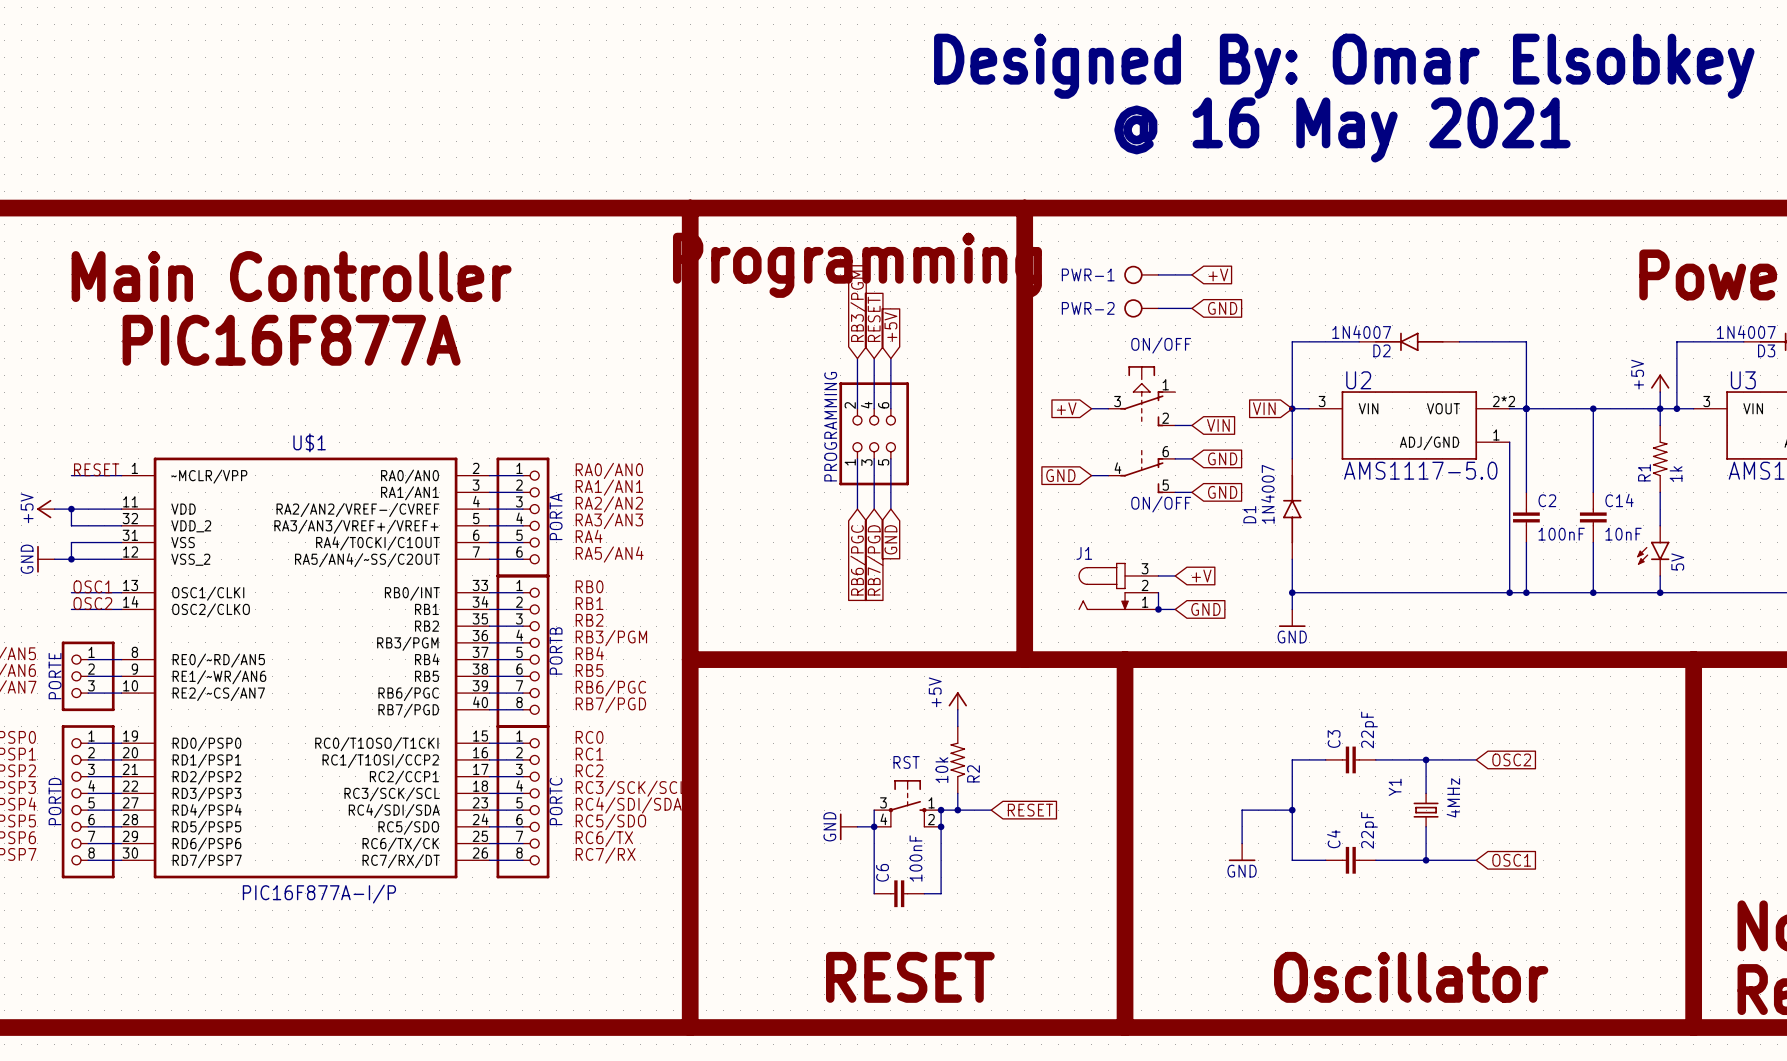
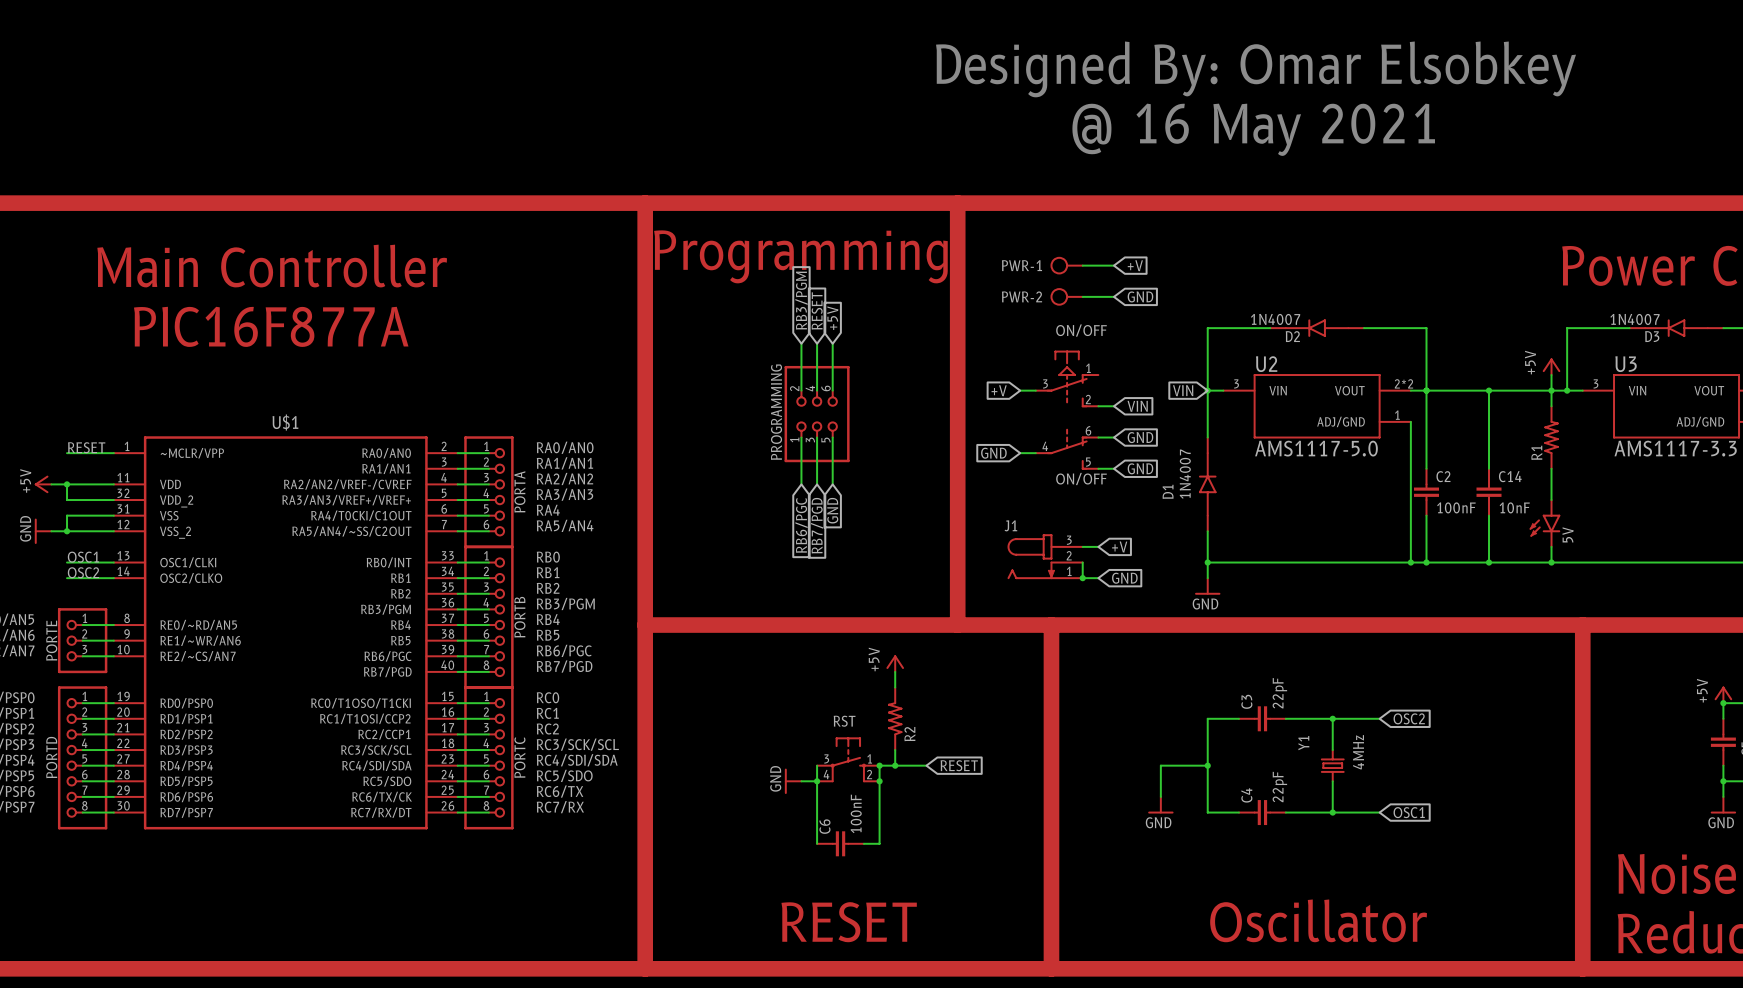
R1 value: 1k (1676, 474) -> none
R2 value: 10k (941, 770) -> none
U$1 value: PIC16F877A-I/P (319, 894) -> none

